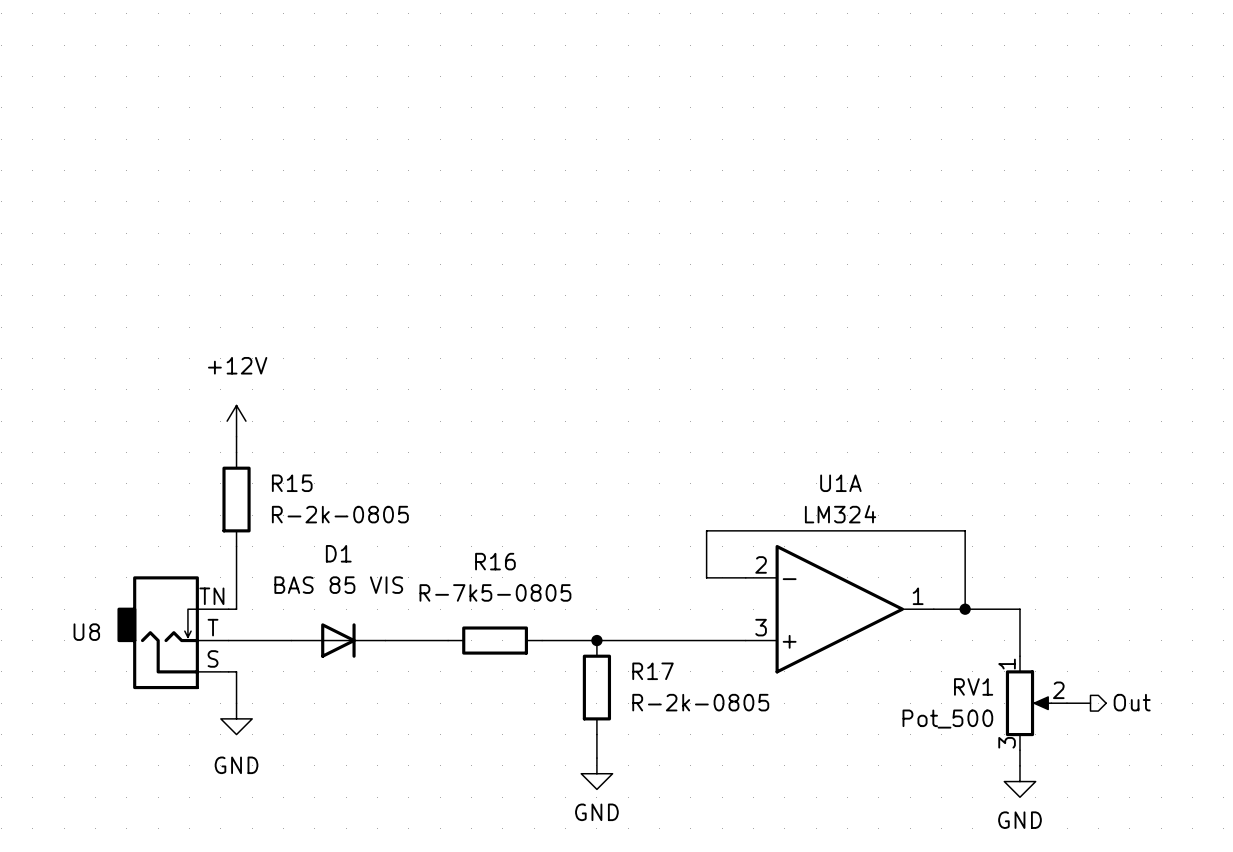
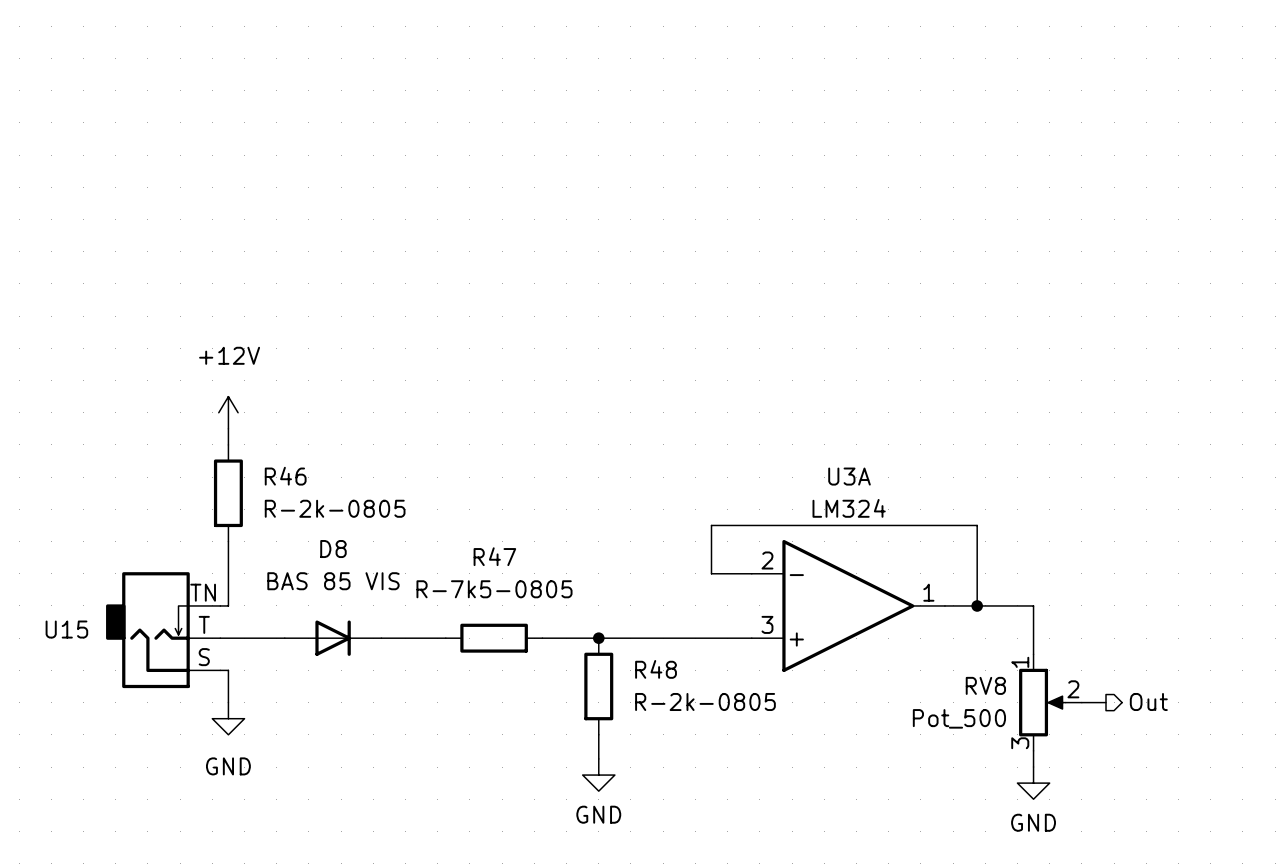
R15 name: R15 (292, 483) -> R46 (285, 476)
U1A name: U1A (840, 483) -> U3A (849, 476)
D1 name: D1 (338, 553) -> D8 (333, 549)
R16 name: R16 (495, 561) -> R47 (494, 556)
U8 name: U8 (86, 632) -> U15 (66, 629)
R17 name: R17 (653, 671) -> R48 (656, 669)
RV1 name: RV1 (973, 686) -> RV8 (985, 685)

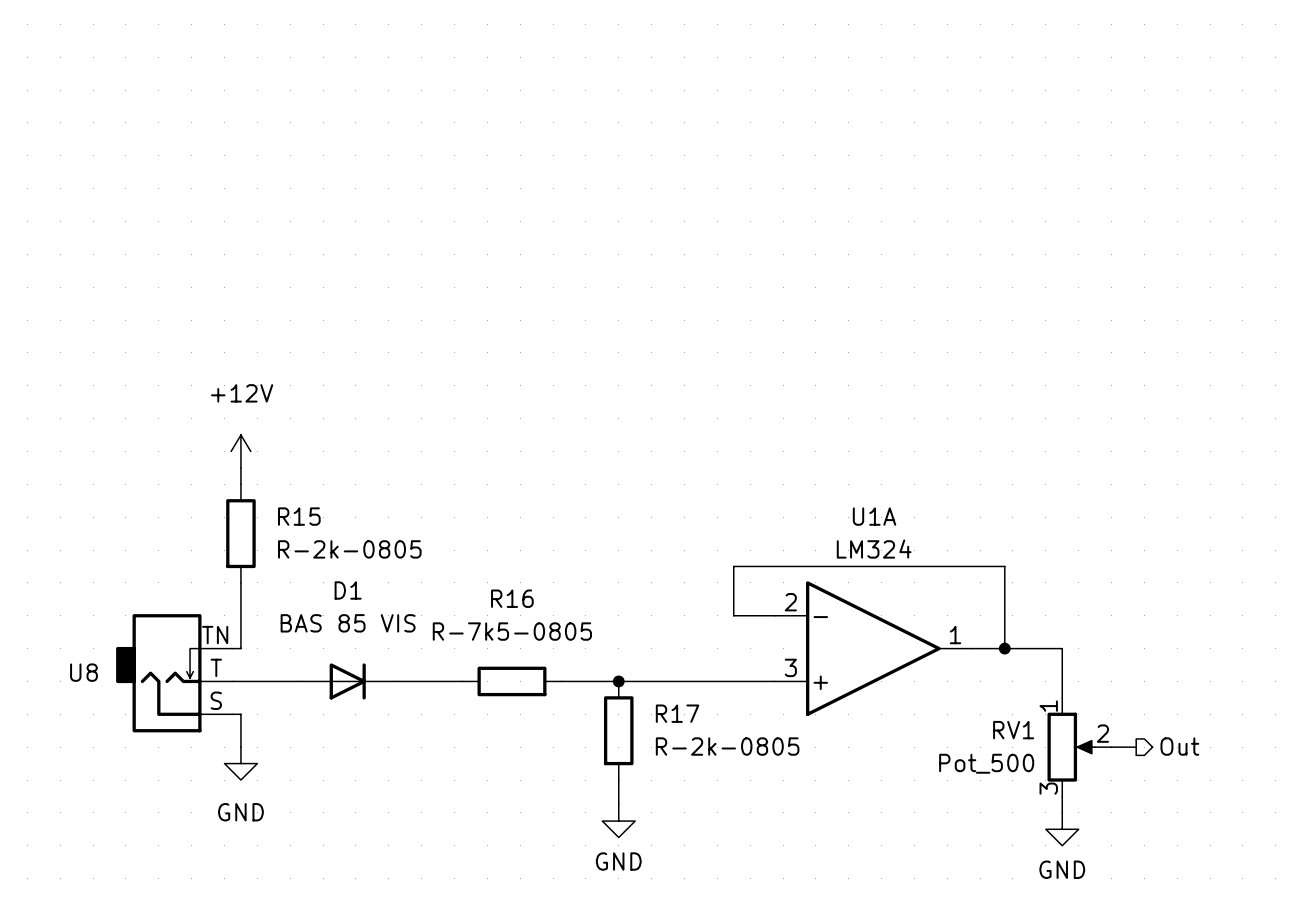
R46 name: R46 (285, 476) -> R15 (299, 516)
U3A name: U3A (849, 476) -> U1A (874, 516)
D8 name: D8 (333, 549) -> D1 (348, 590)
R47 name: R47 (494, 556) -> R16 (512, 598)
U15 name: U15 (66, 629) -> U8 (83, 672)
R48 name: R48 (656, 669) -> R17 (677, 713)
RV8 name: RV8 (985, 685) -> RV1 (1013, 730)

